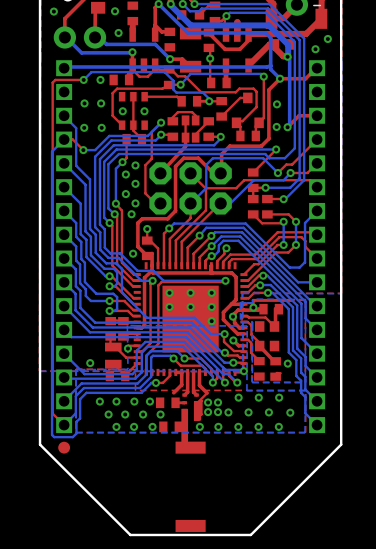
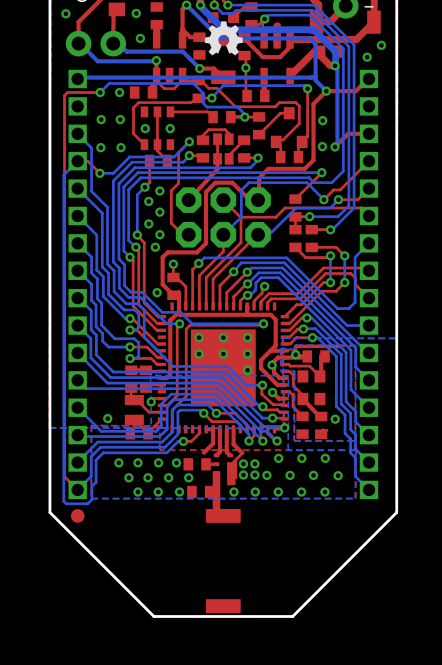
drawing: none -> [204, 21, 243, 56]

